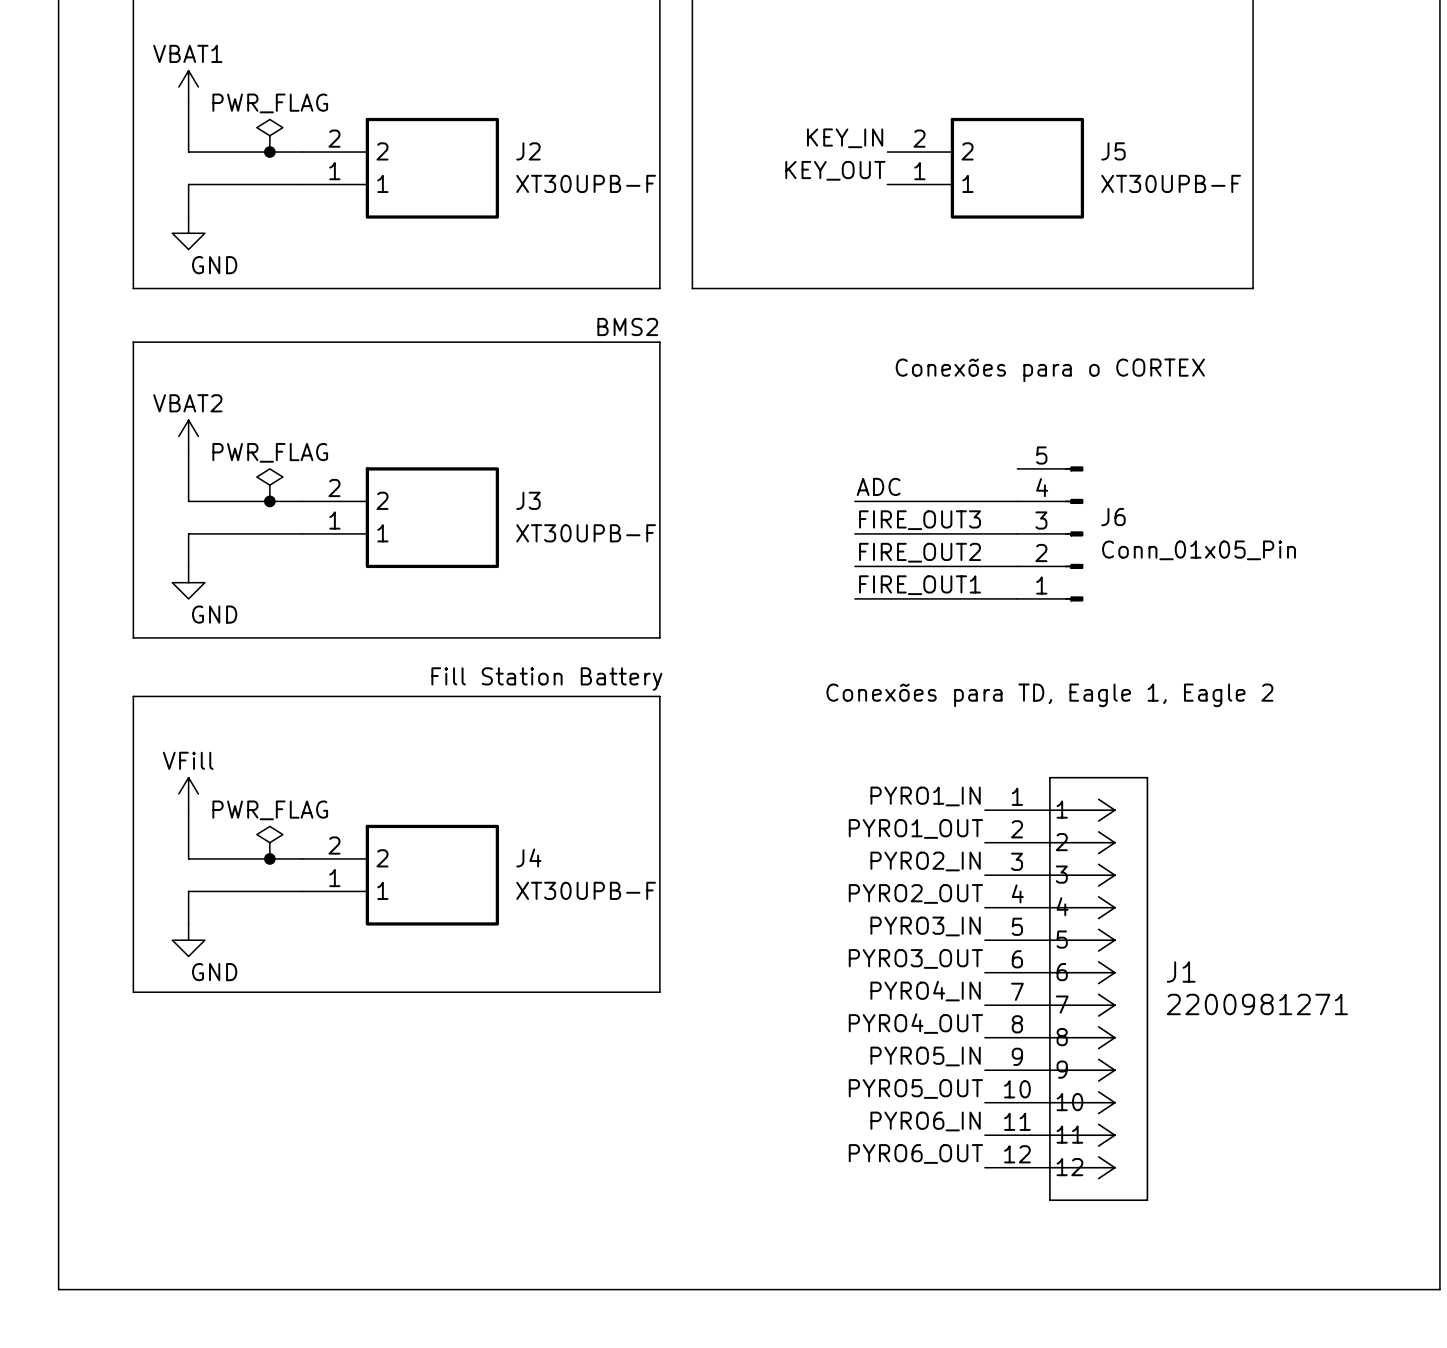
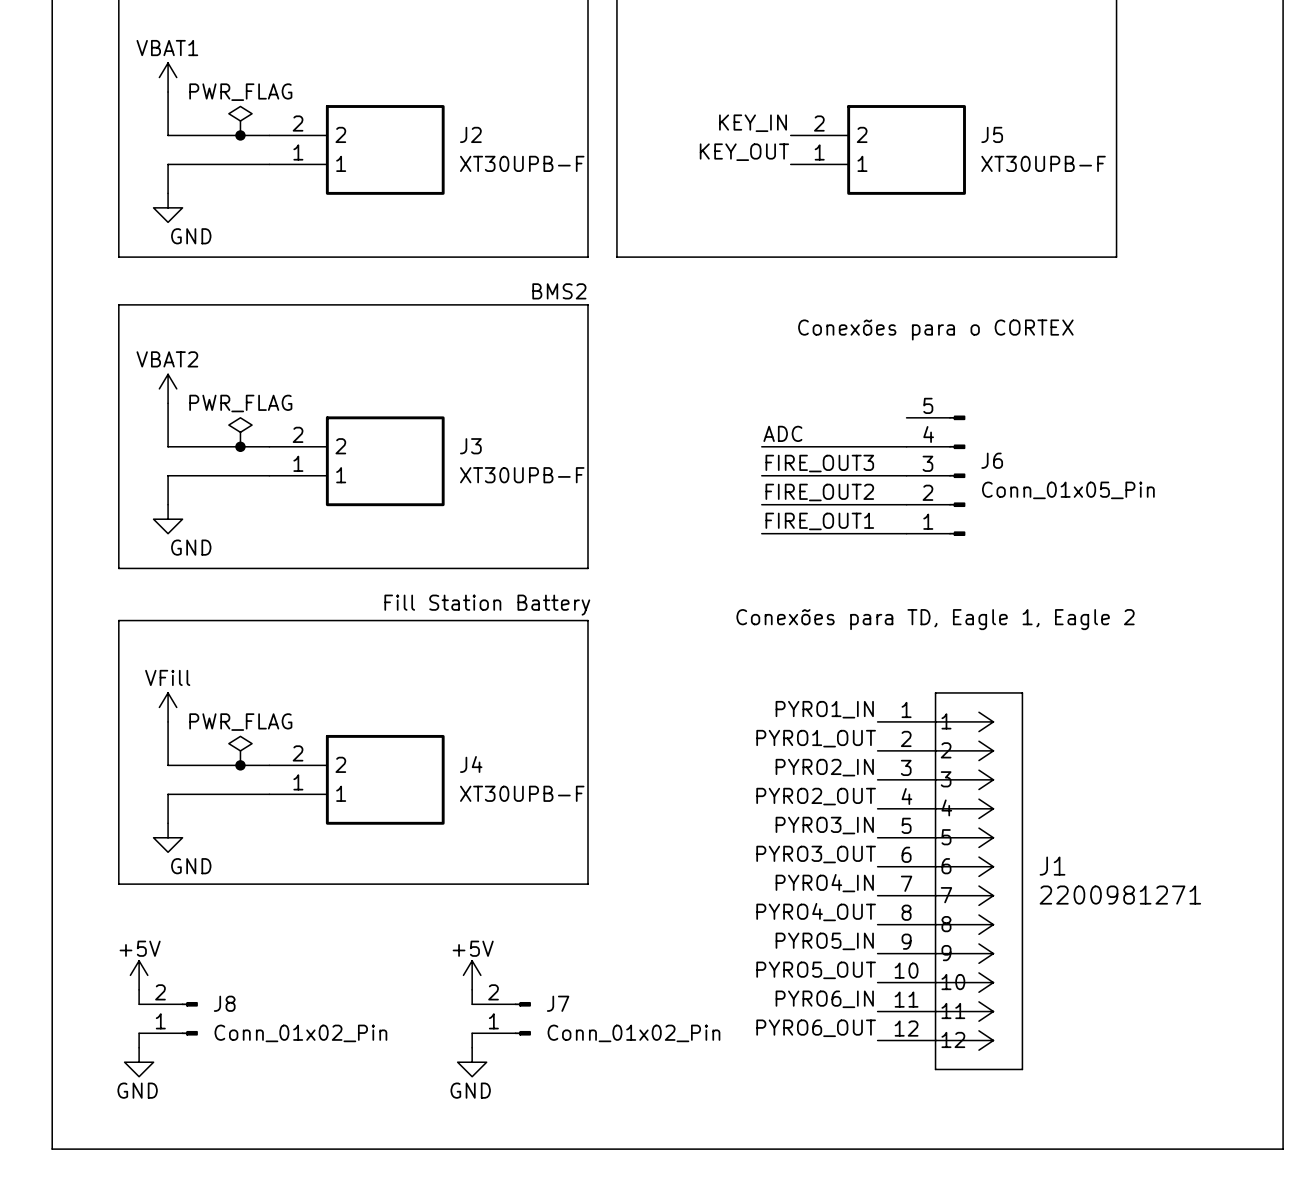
power symbol: none -> +5V (139, 975)
power symbol: none -> +5V (472, 975)
wire: none -> (139, 989) (139, 1004)
wire: none -> (472, 989) (472, 1004)
J8: none -> Conn_01x02_Pin (168, 1018)
J7: none -> Conn_01x02_Pin (501, 1018)
wire: none -> (139, 1033) (139, 1047)
wire: none -> (472, 1033) (472, 1047)
power symbol: none -> GND (139, 1062)
power symbol: none -> GND (472, 1062)

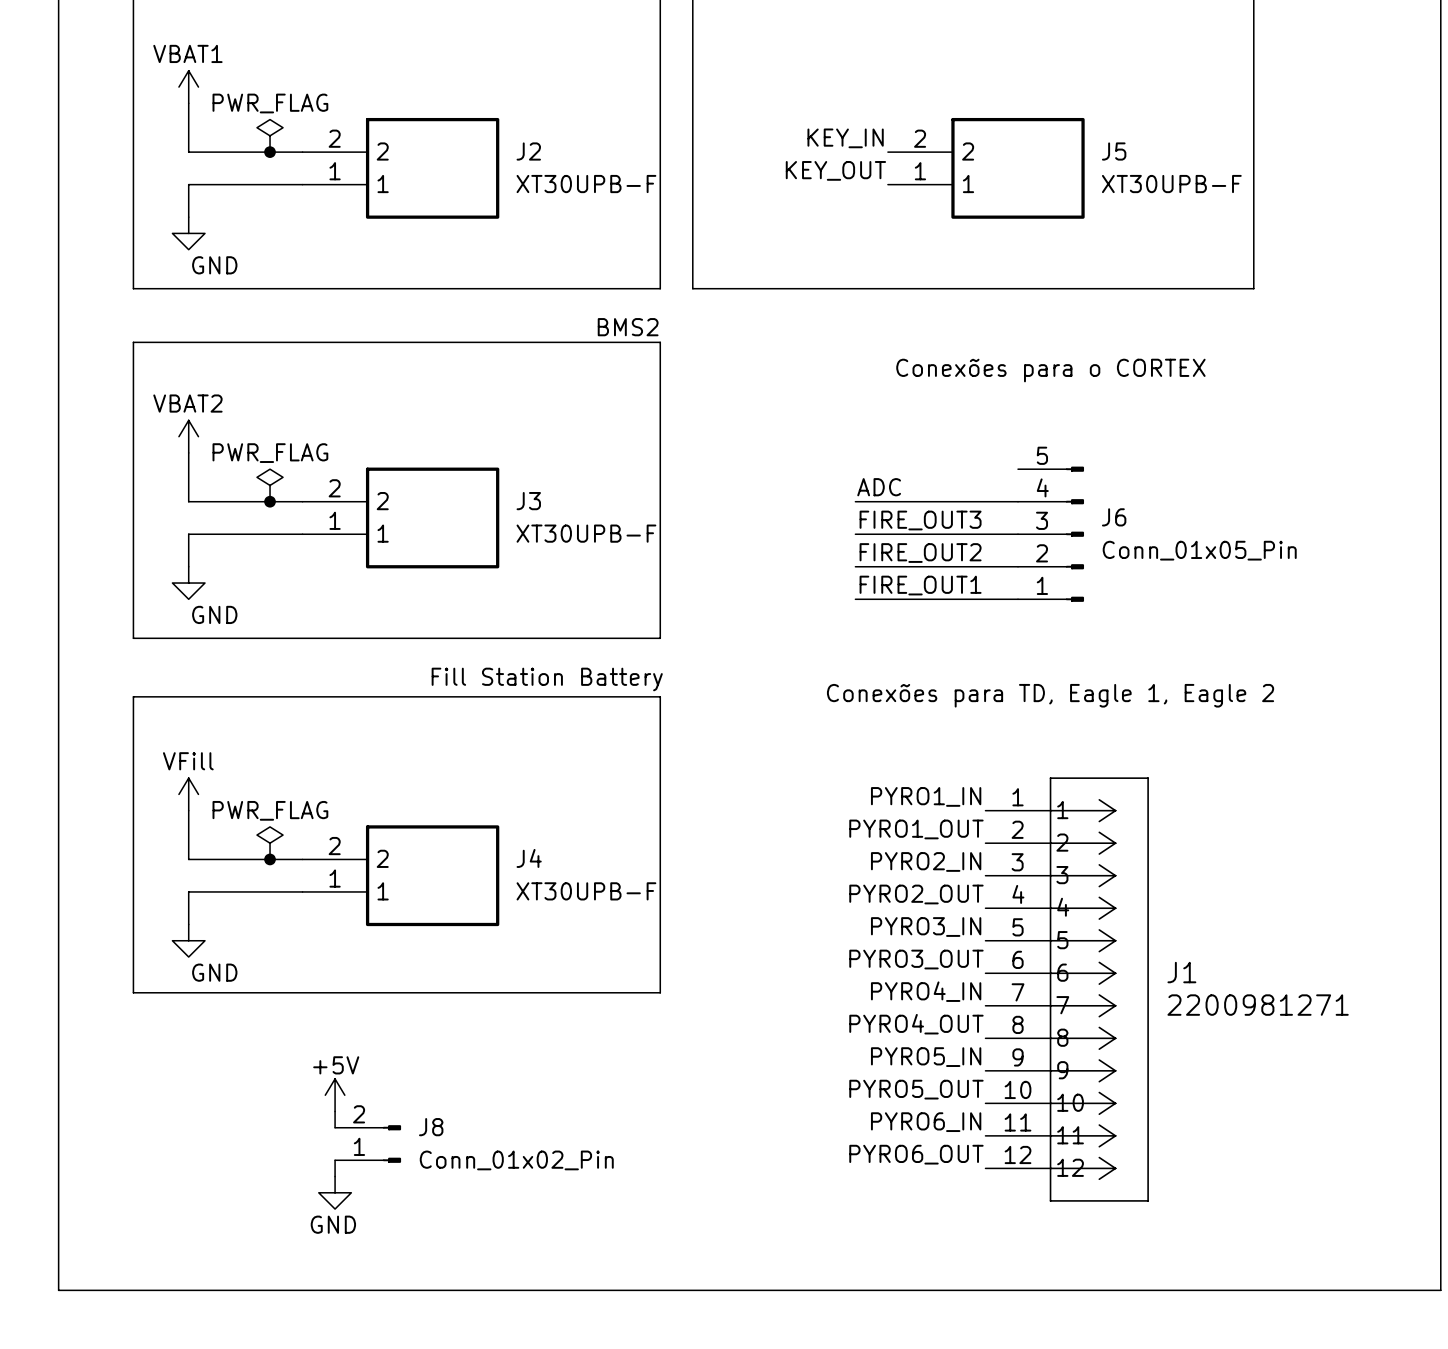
power symbol: +5V (139, 975) -> none
power symbol: none -> +5V (335, 1095)
power symbol: +5V (472, 975) -> none
wire: (139, 989) (139, 1004) -> (335, 1111) (335, 1127)
wire: (472, 989) (472, 1004) -> none
J8 position: (168, 1018) -> (368, 1144)
J7: Conn_01x02_Pin (501, 1018) -> none
wire: (139, 1033) (139, 1047) -> (335, 1160) (335, 1176)
wire: (472, 1033) (472, 1047) -> none
power symbol: GND (139, 1062) -> none
power symbol: none -> GND (335, 1192)
power symbol: GND (472, 1062) -> none

